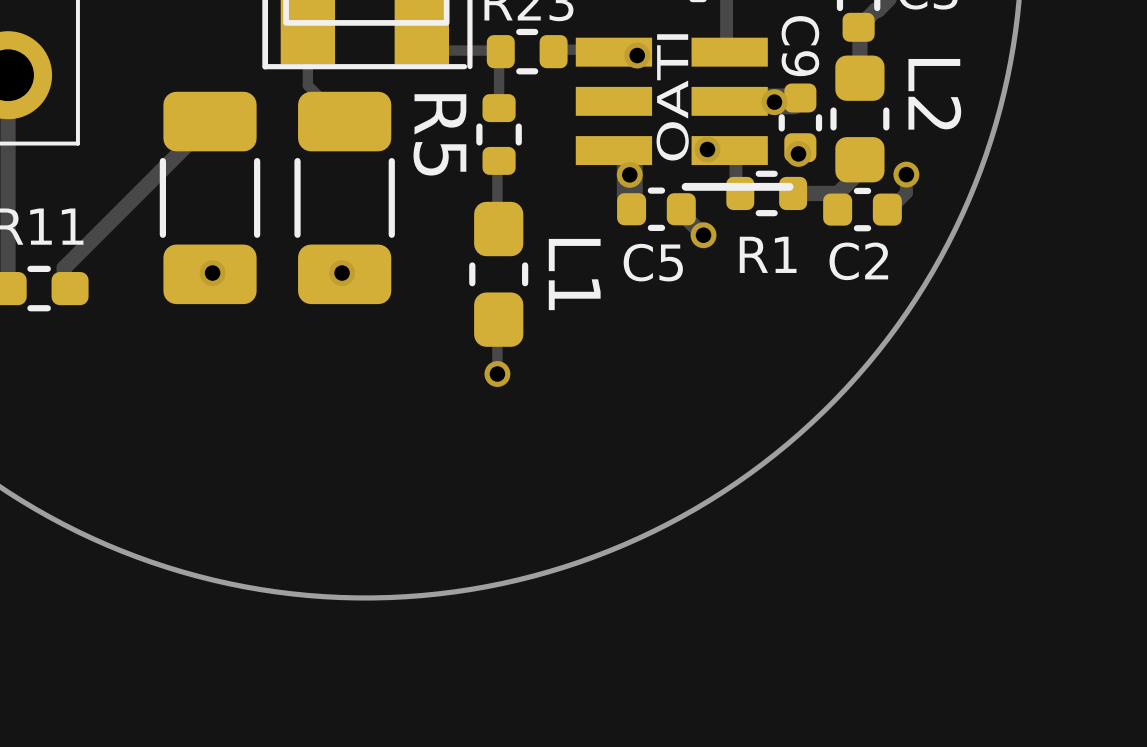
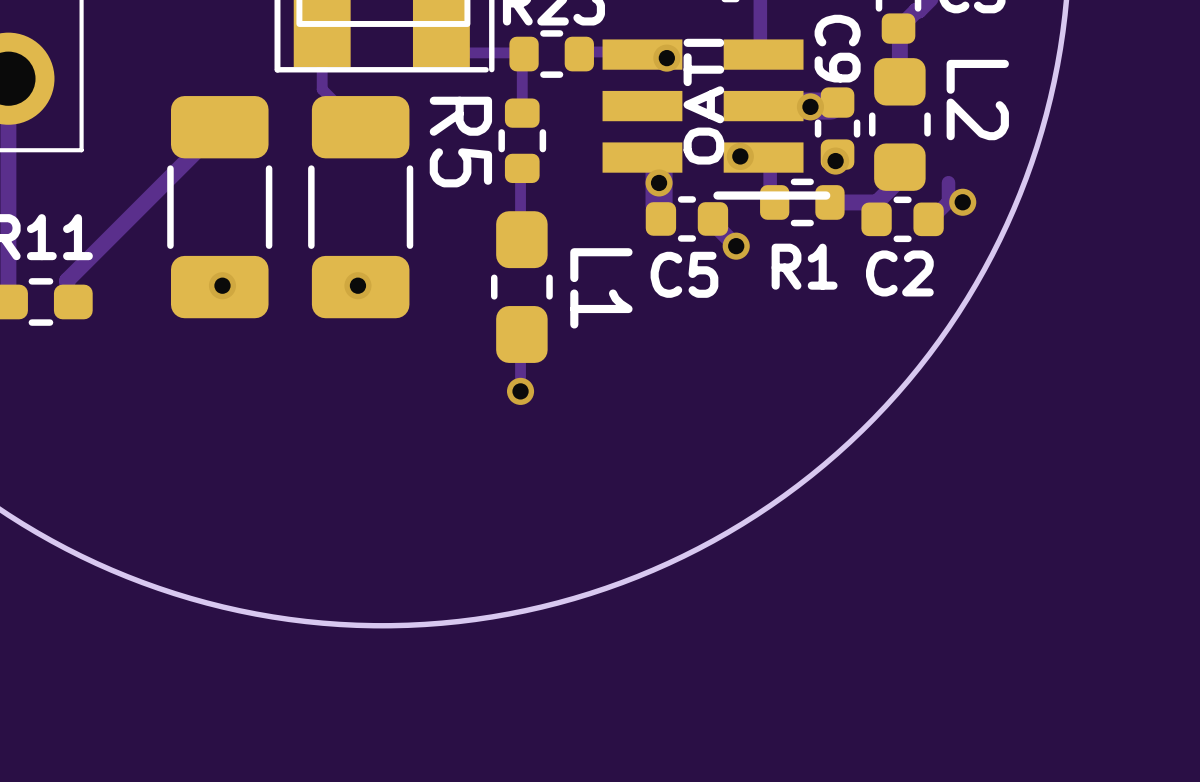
via position: (906, 174) -> (962, 202)

